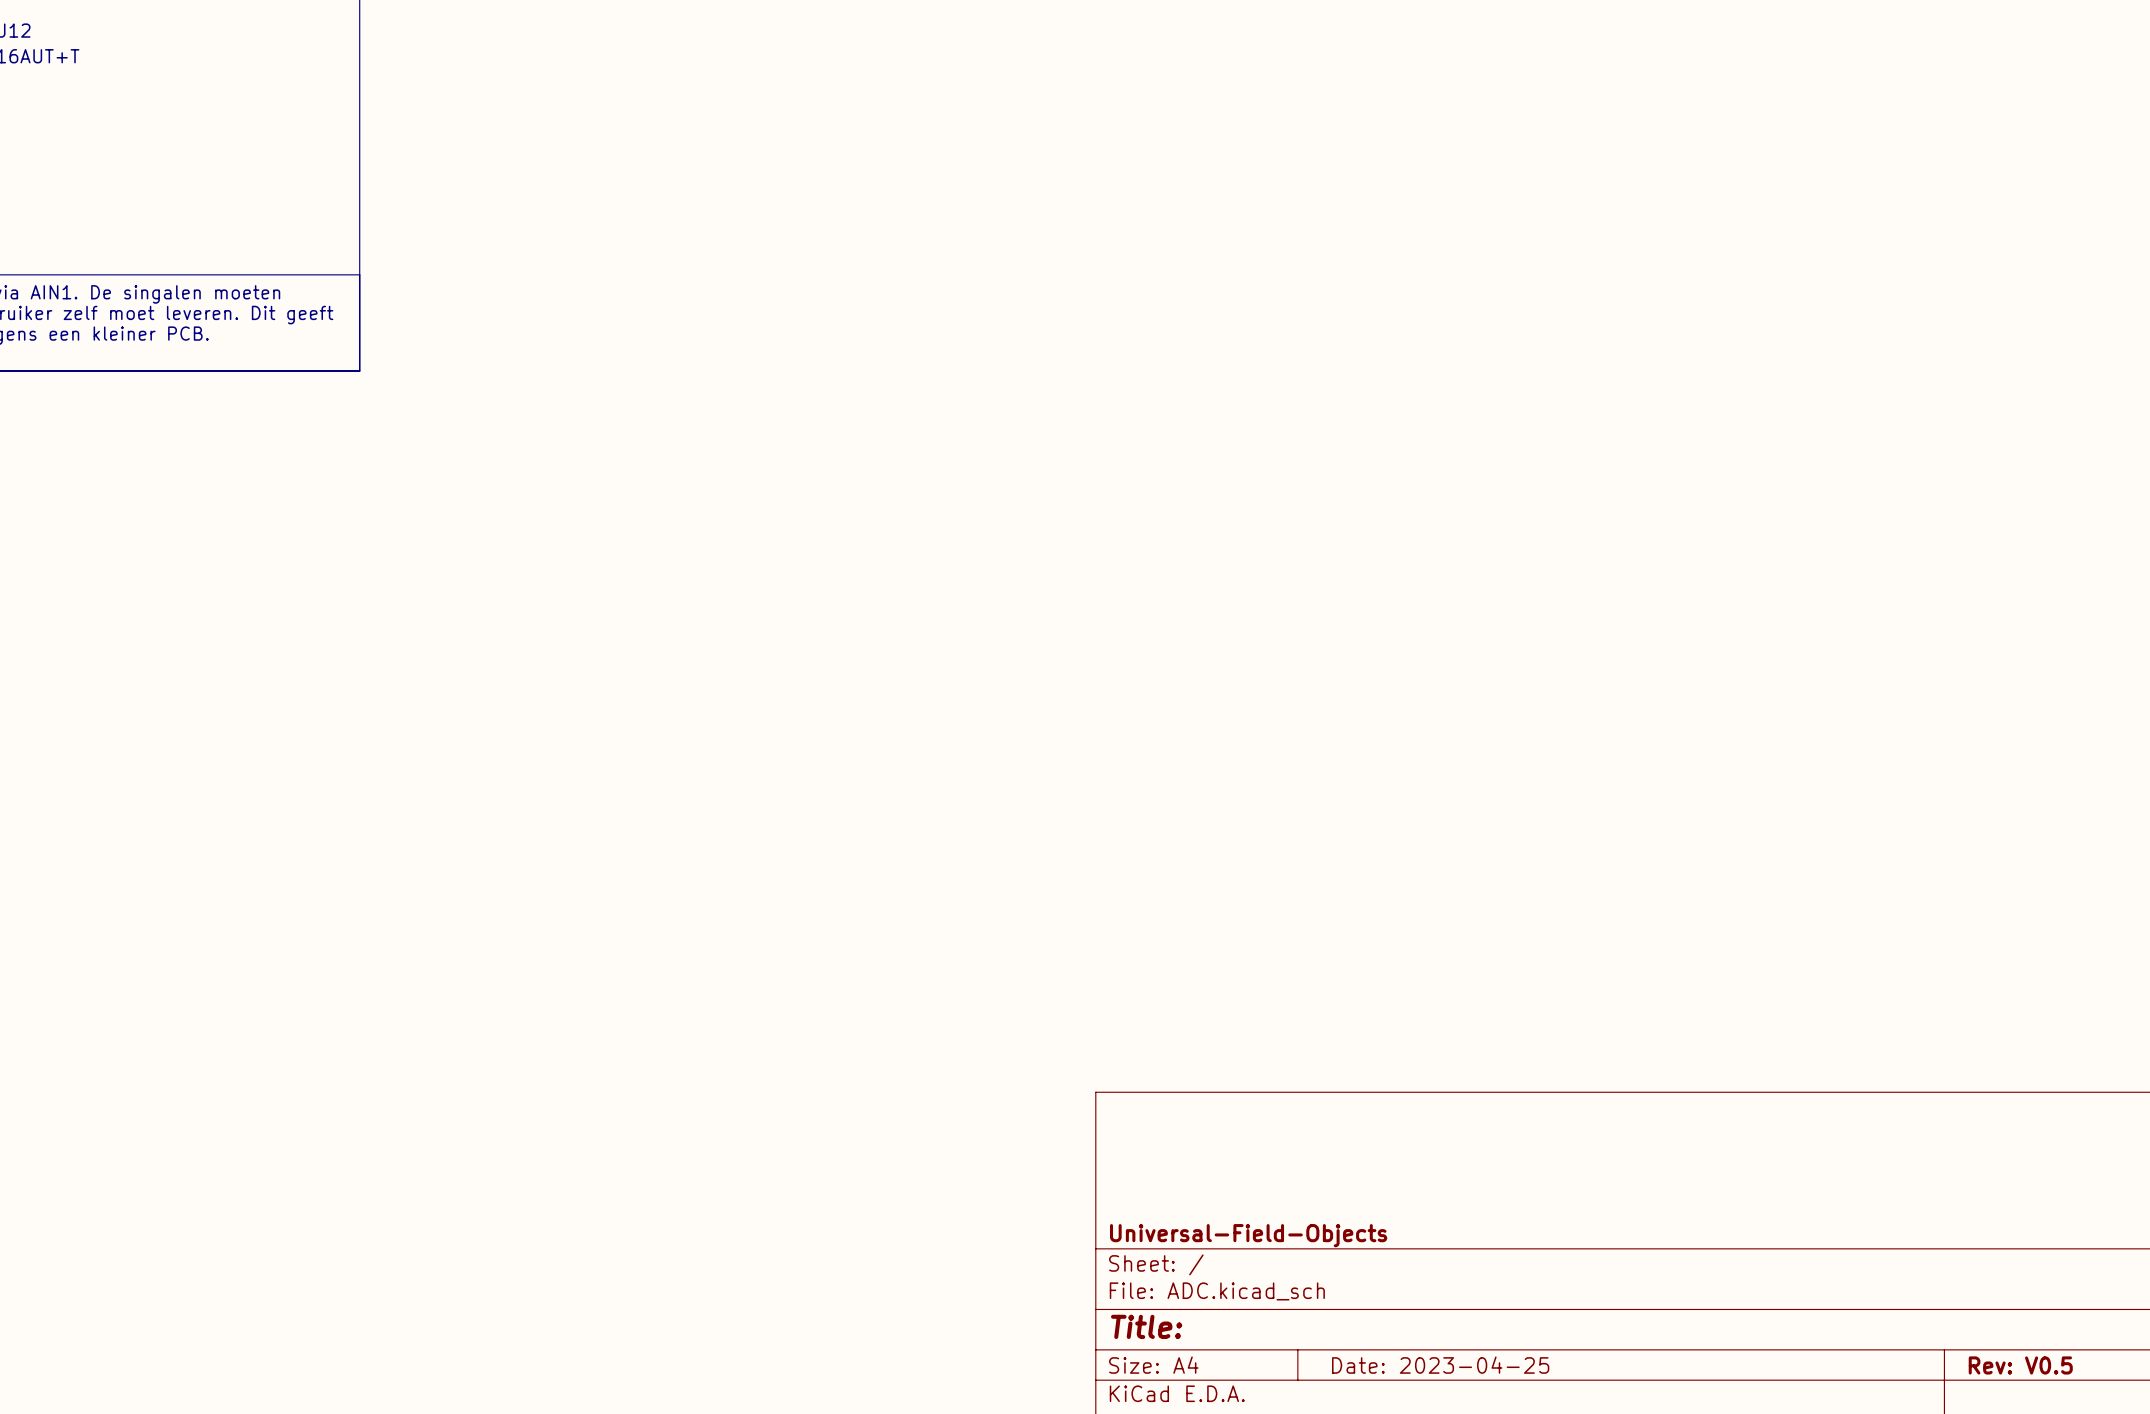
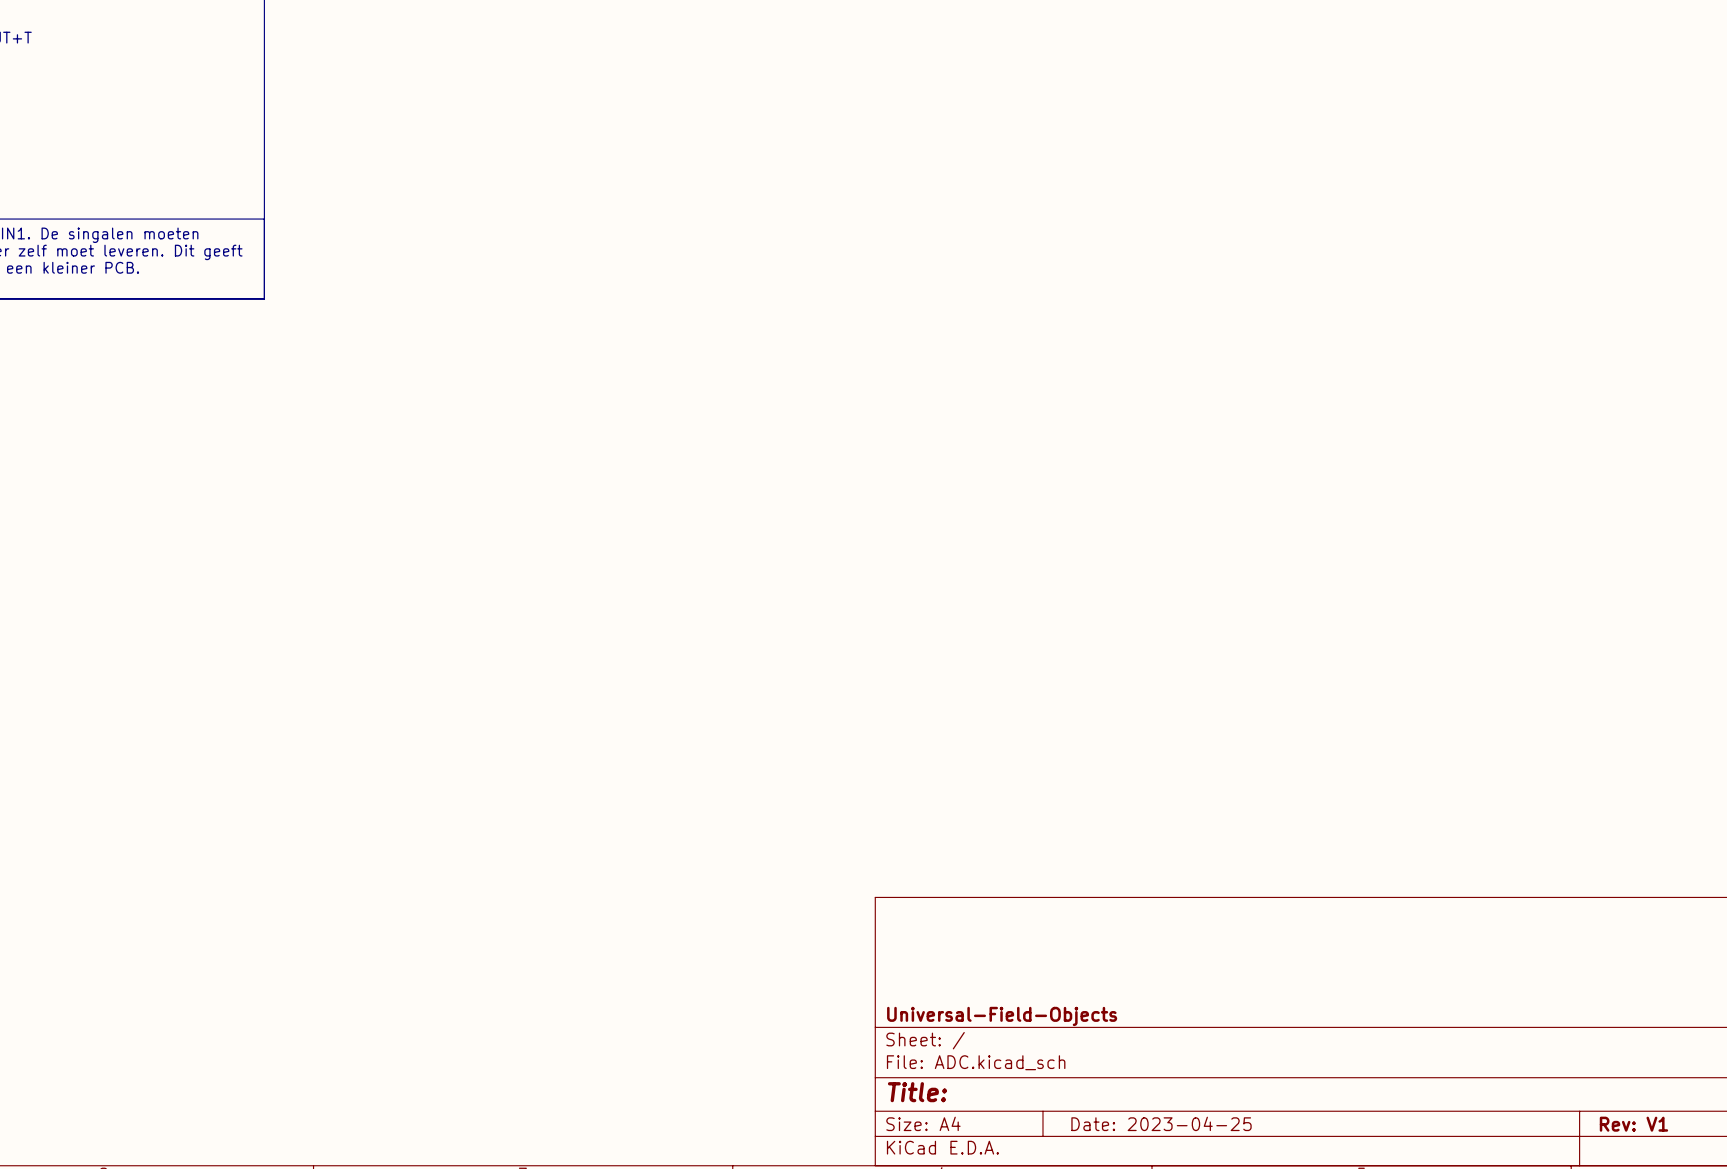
title block: Rev: V0.5 (2020, 1365) -> Rev: V1 (1633, 1124)

